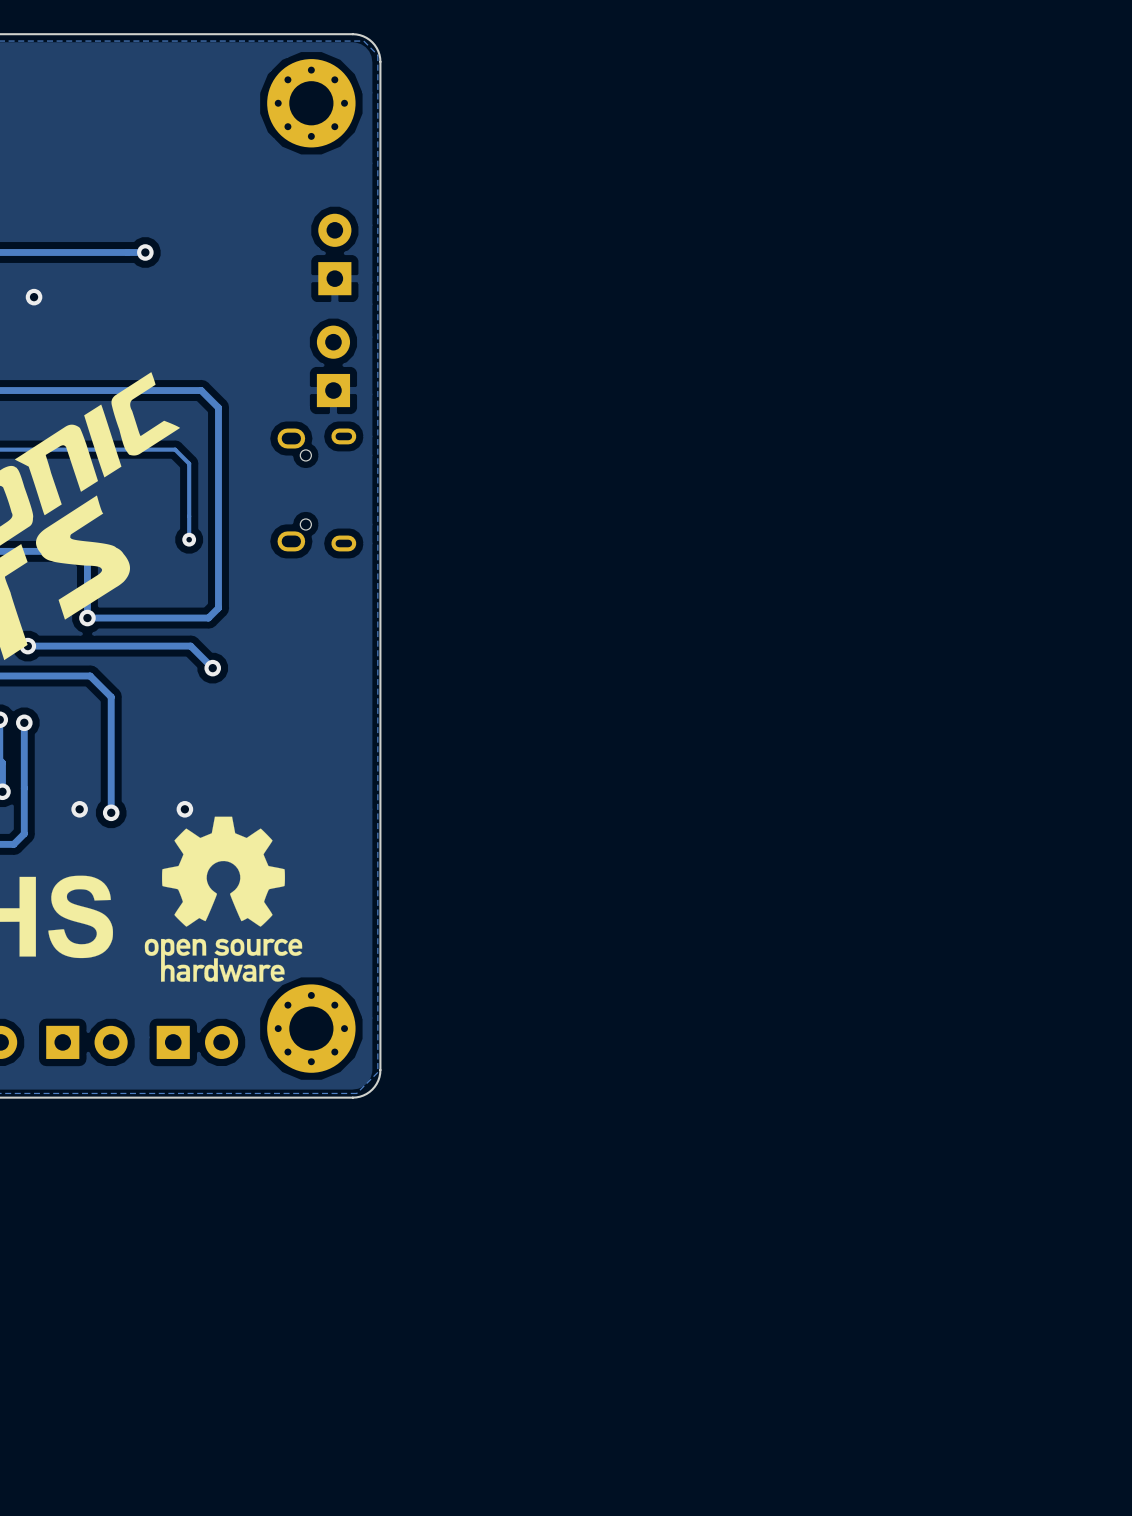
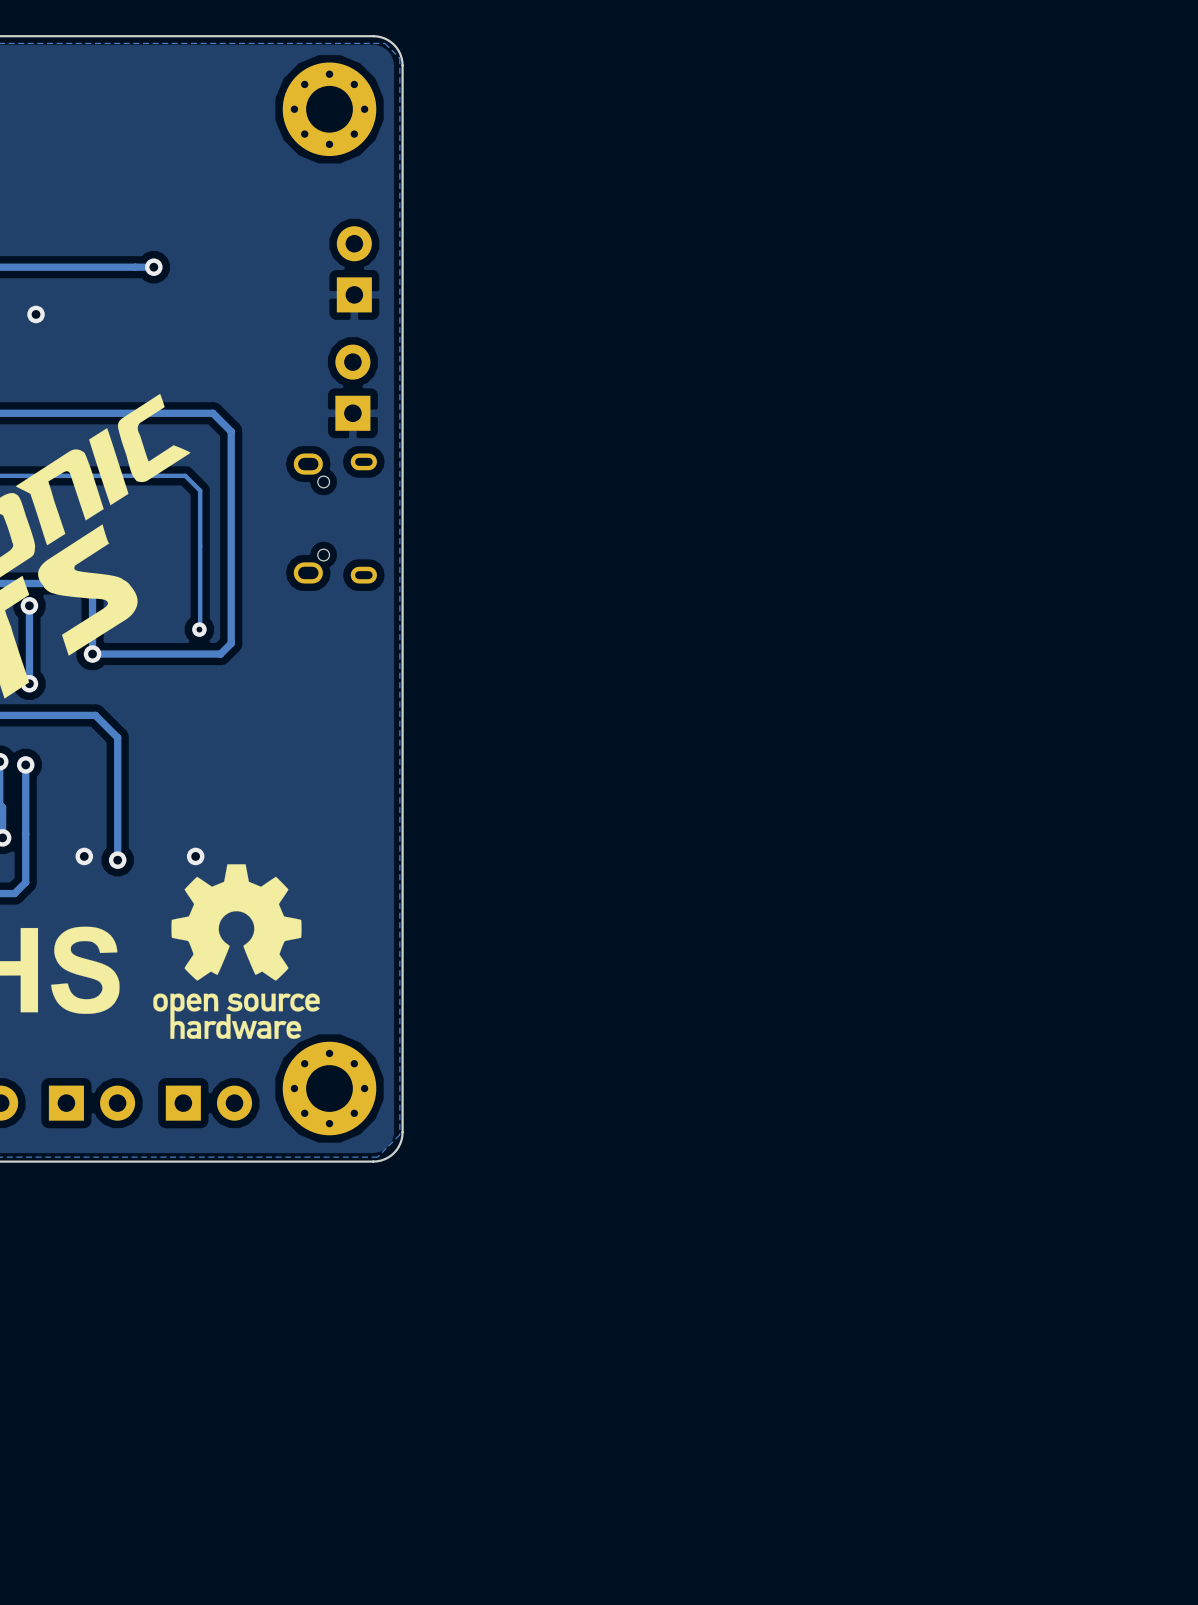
track: none -> (200, 571) (199, 629)
via position: (189, 539) -> (199, 629)
via: none -> (29, 605)
track: (27, 646) (190, 646) (212, 668) -> (29, 683) (29, 605)
via: (212, 668) -> none

